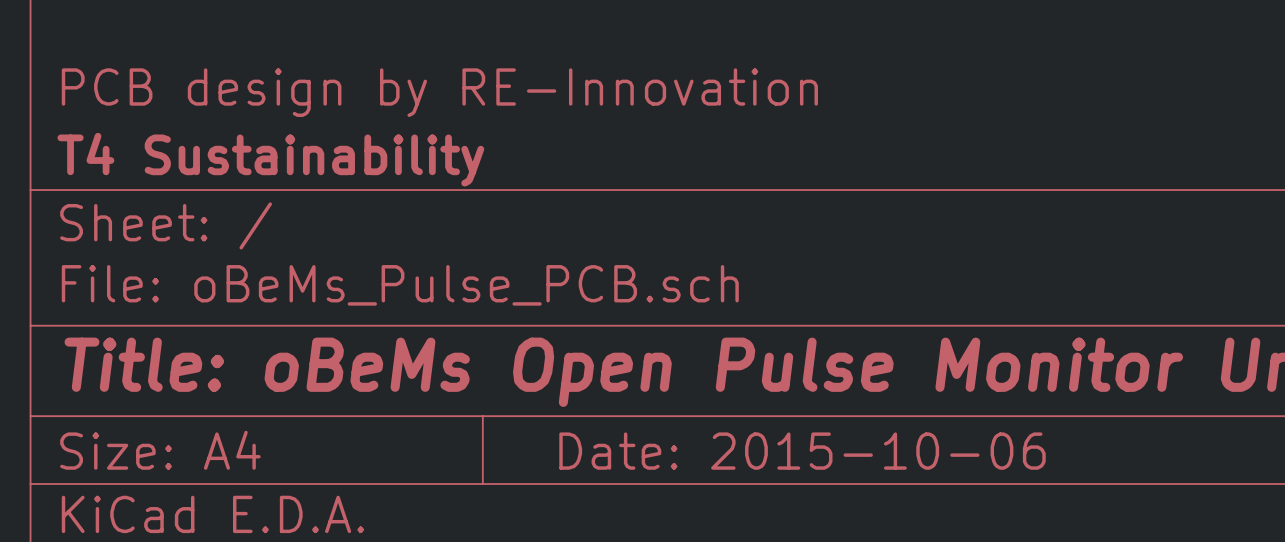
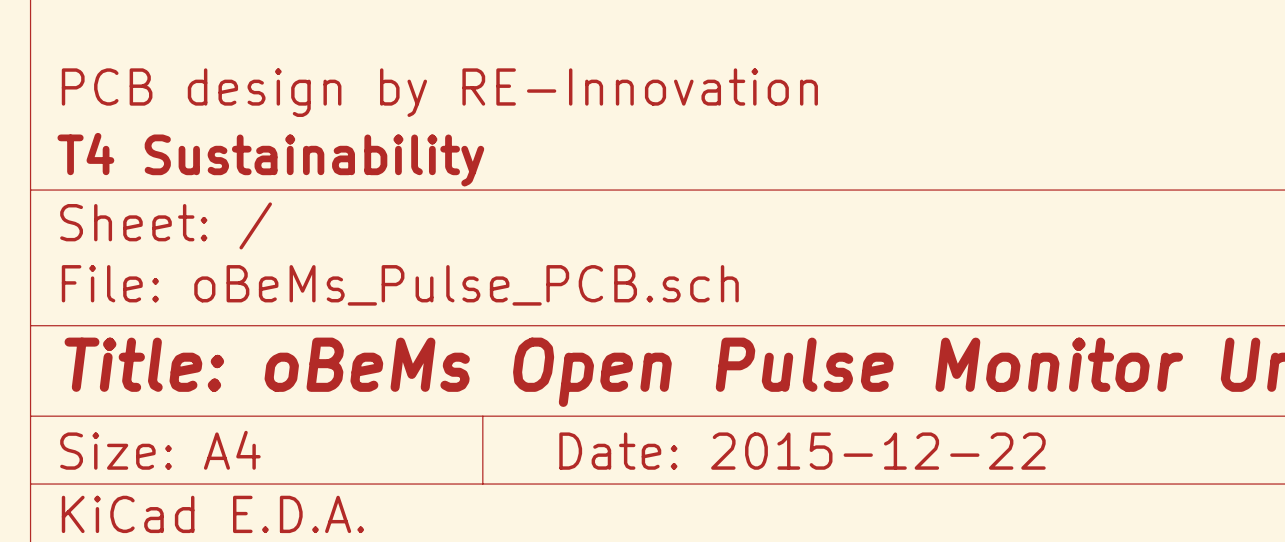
title block: Date: 2015-10-06 (802, 451) -> Date: 2015-12-22 (802, 451)

